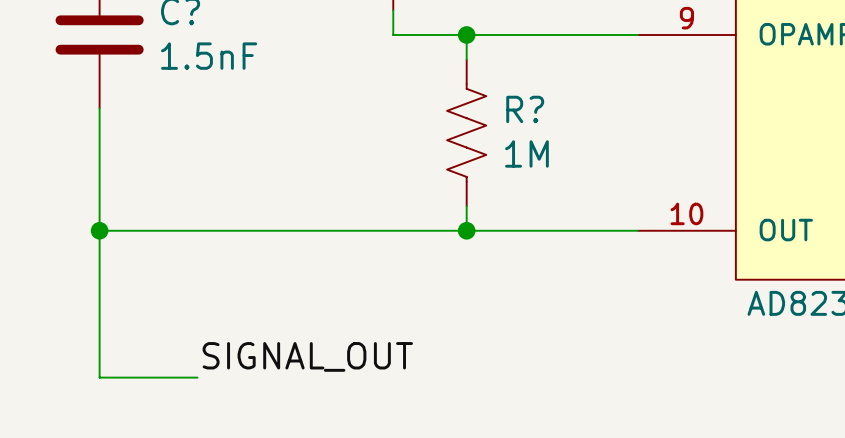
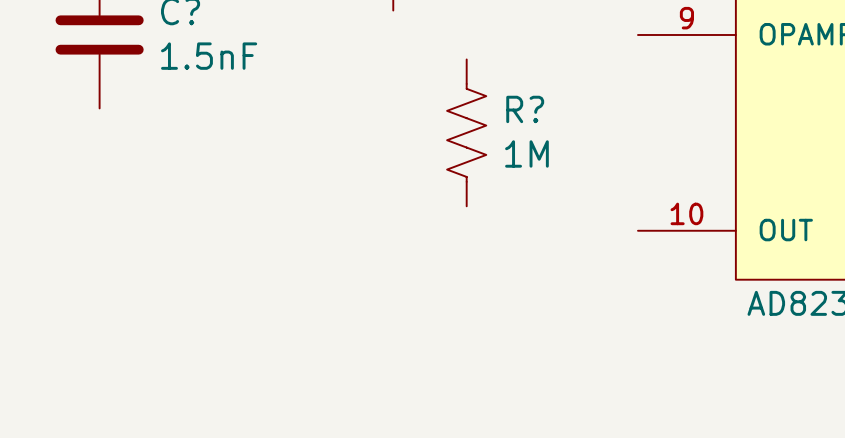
wire: (393, 10) (393, 34) (637, 34) -> none
wire: (466, 34) (466, 59) -> none
junction: (466, 34) -> none
wire: (99, 108) (99, 377) (197, 377) -> none
wire: (466, 206) (466, 230) -> none
wire: (99, 230) (637, 230) -> none
junction: (99, 230) -> none
junction: (466, 230) -> none
label: SIGNAL_OUT (307, 356) -> none

